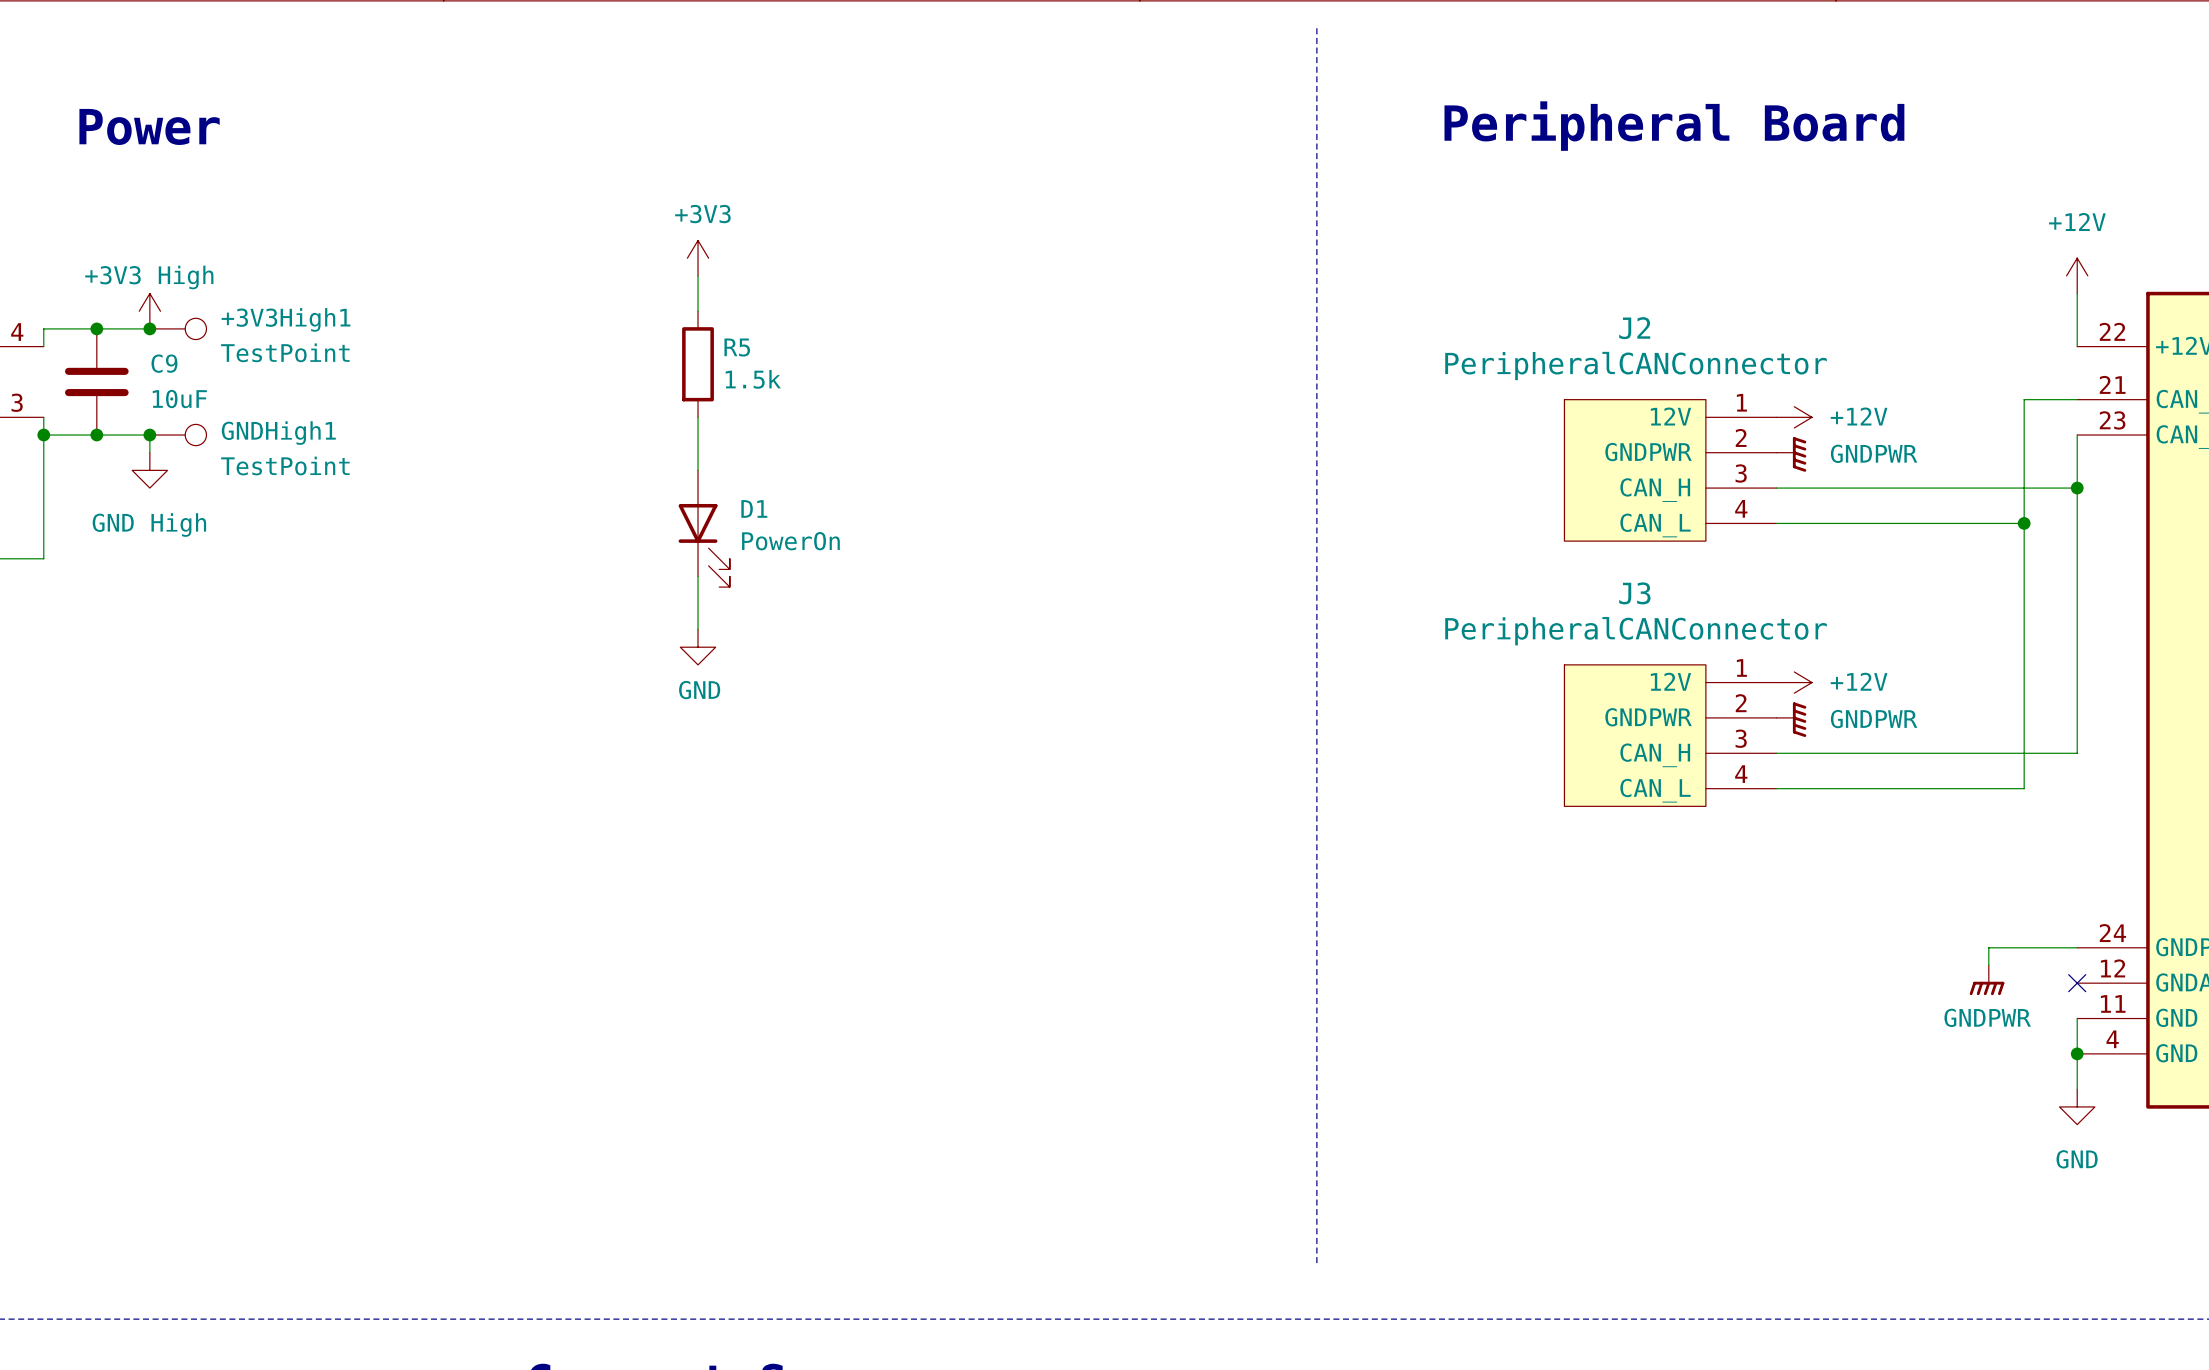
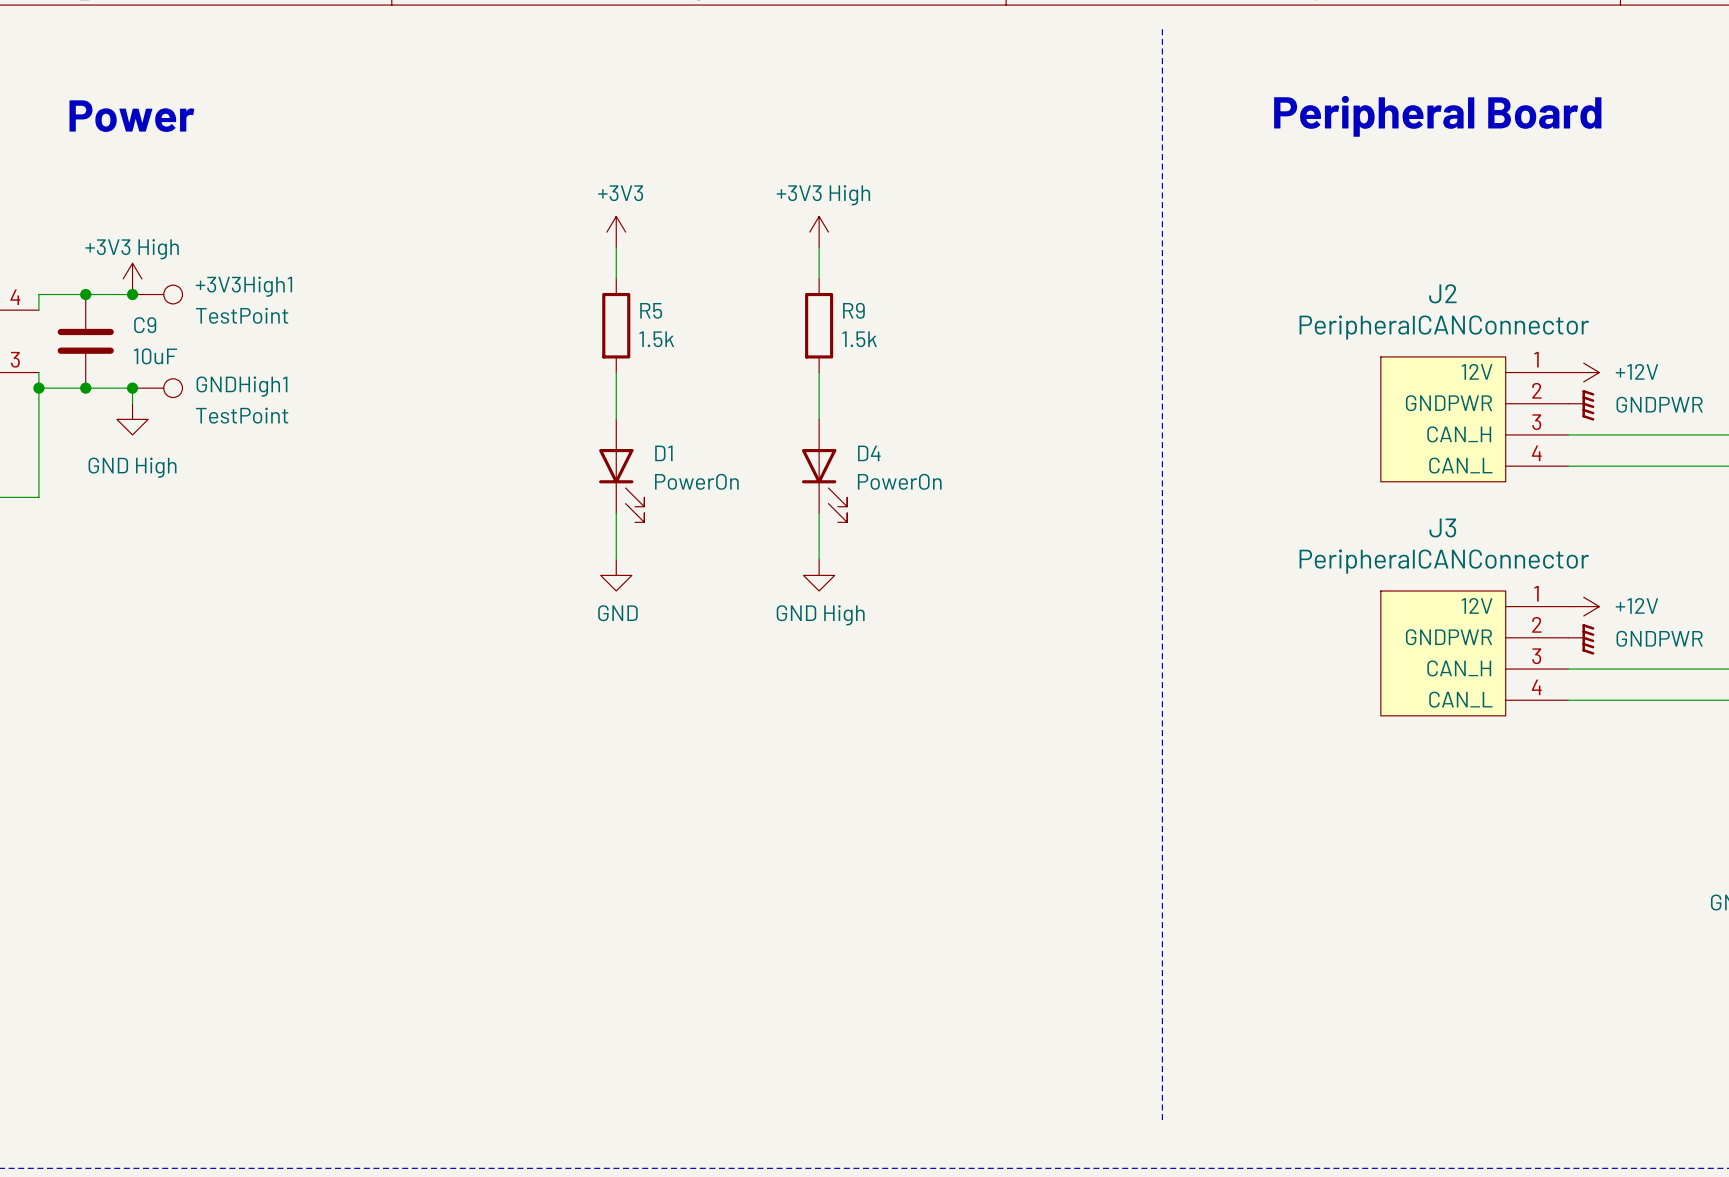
power symbol: none -> +3V3 High (819, 232)
wire: none -> (819, 247) (819, 278)
R9: none -> 1.5k (819, 325)
wire: none -> (819, 372) (819, 419)
D4: none -> PowerOn (824, 470)
wire: none -> (819, 512) (819, 559)
power symbol: none -> GND High (819, 575)

